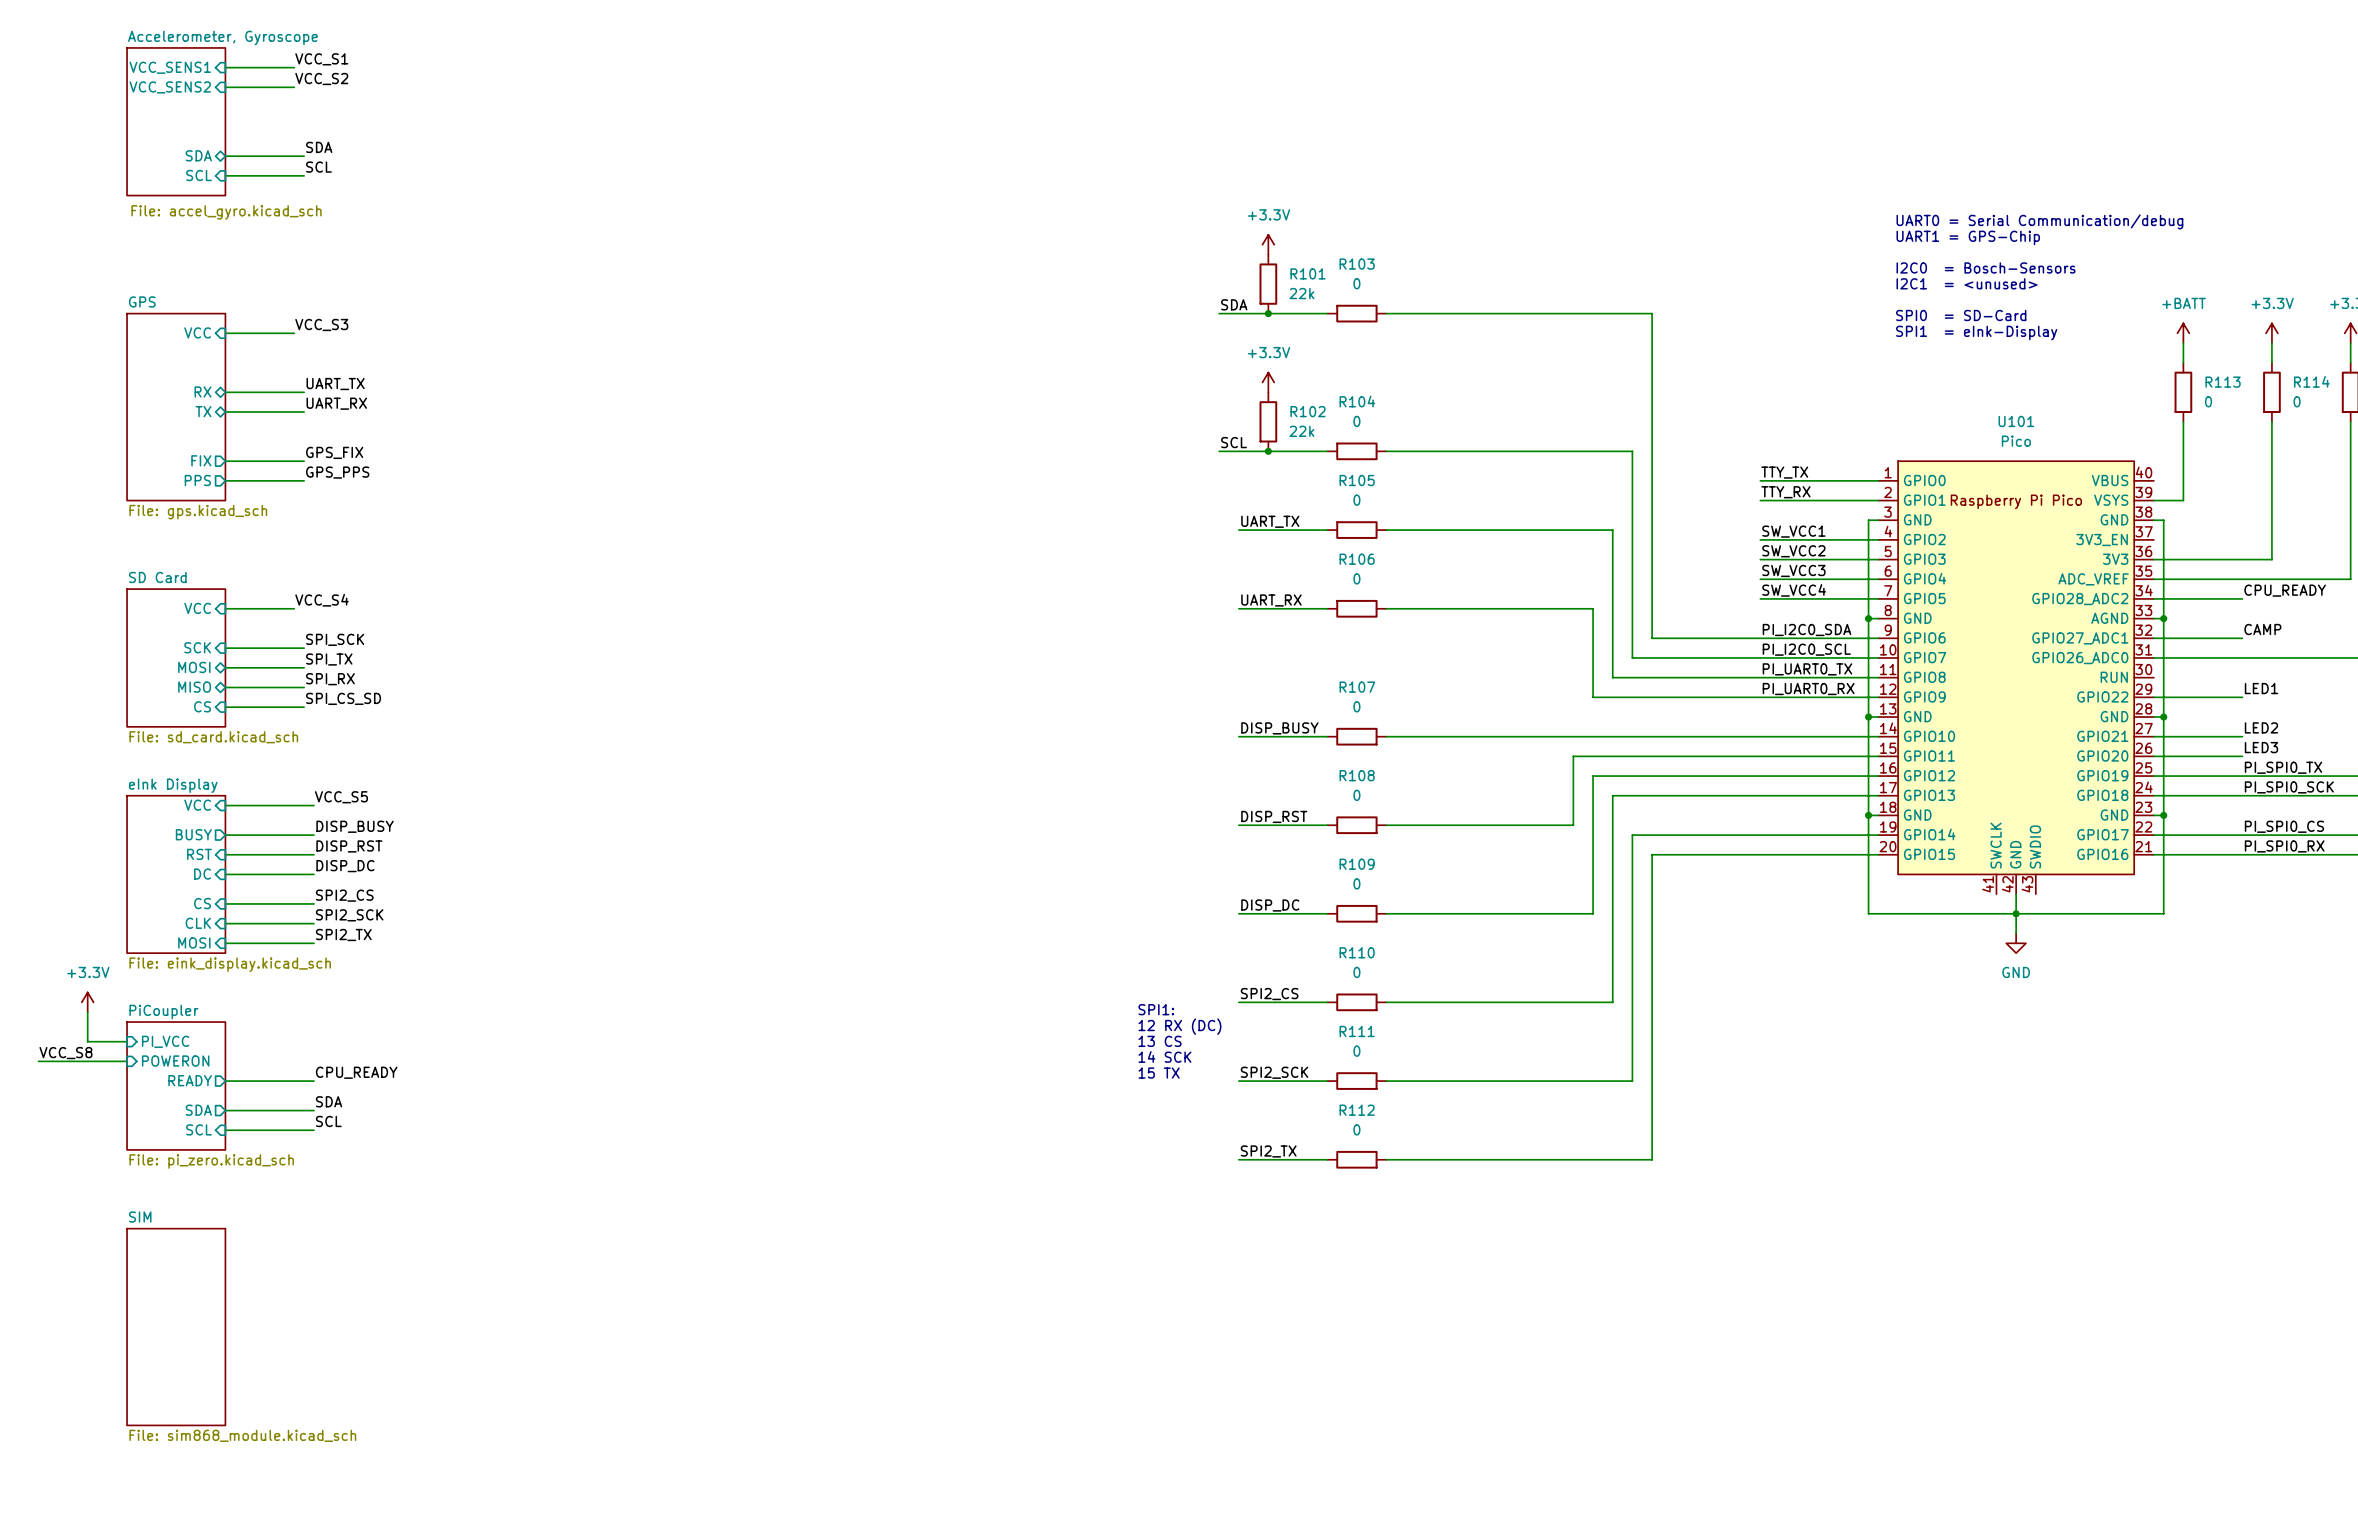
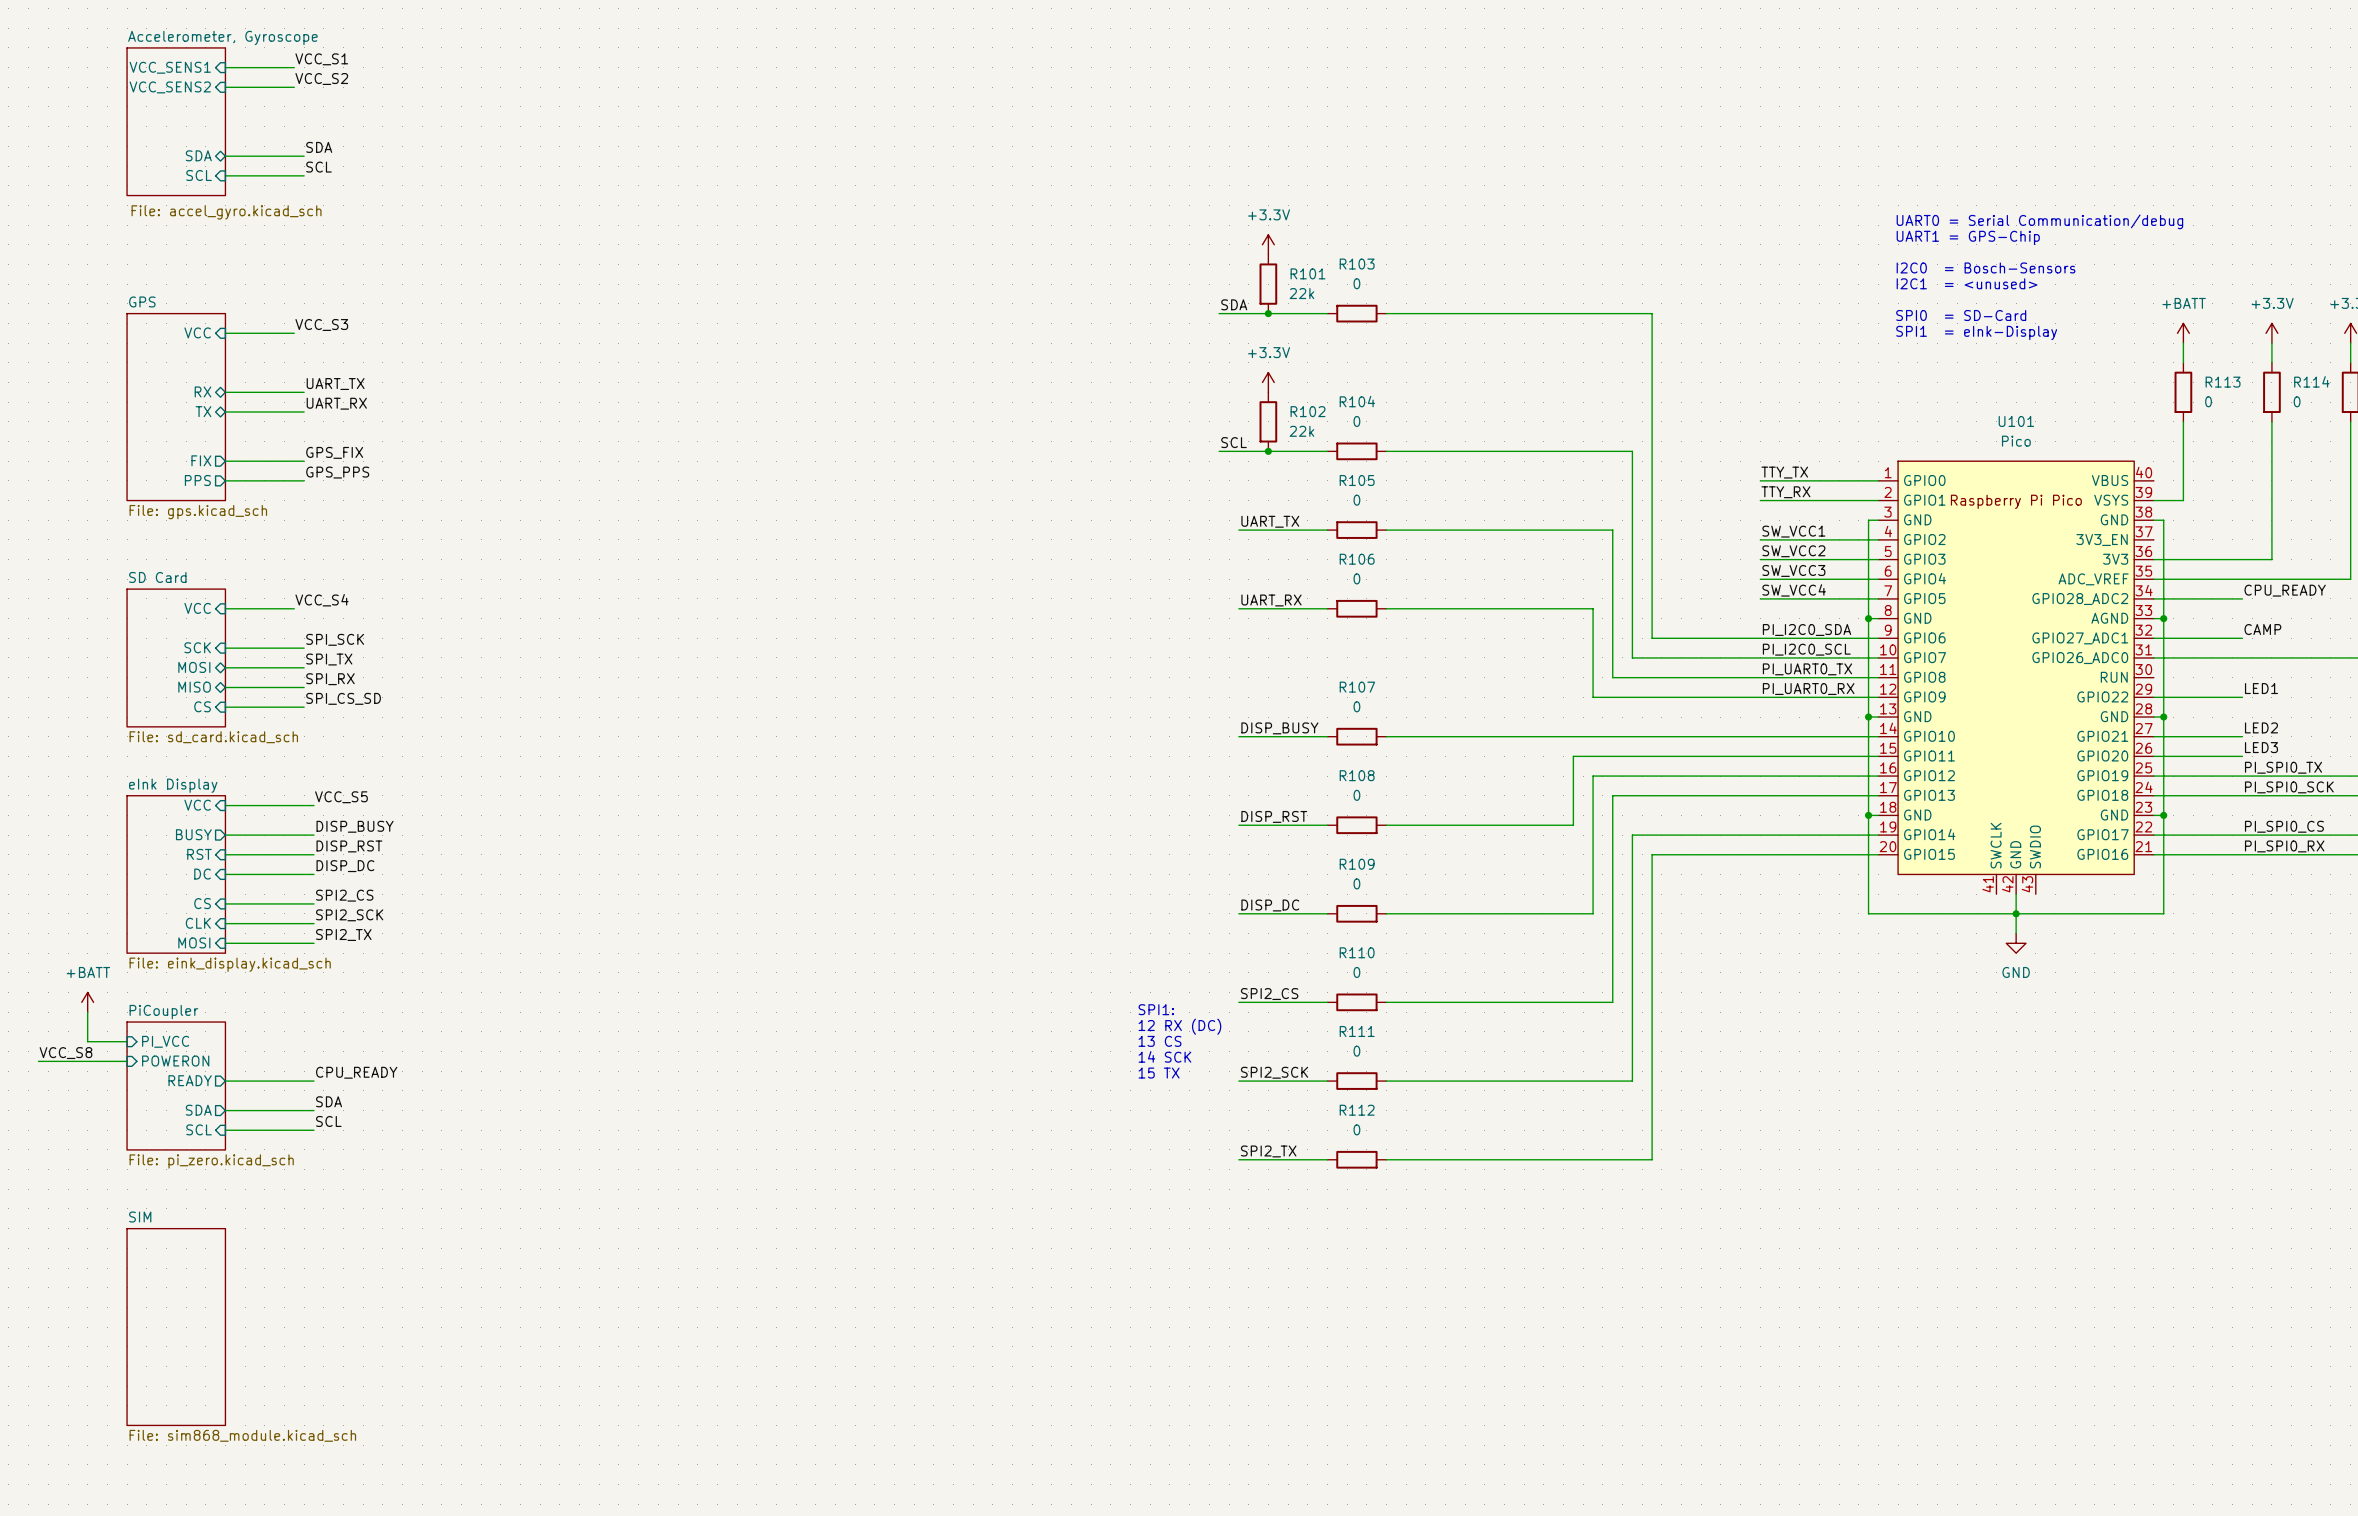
power symbol: +3.3V (87, 1002) -> +BATT (87, 1002)

